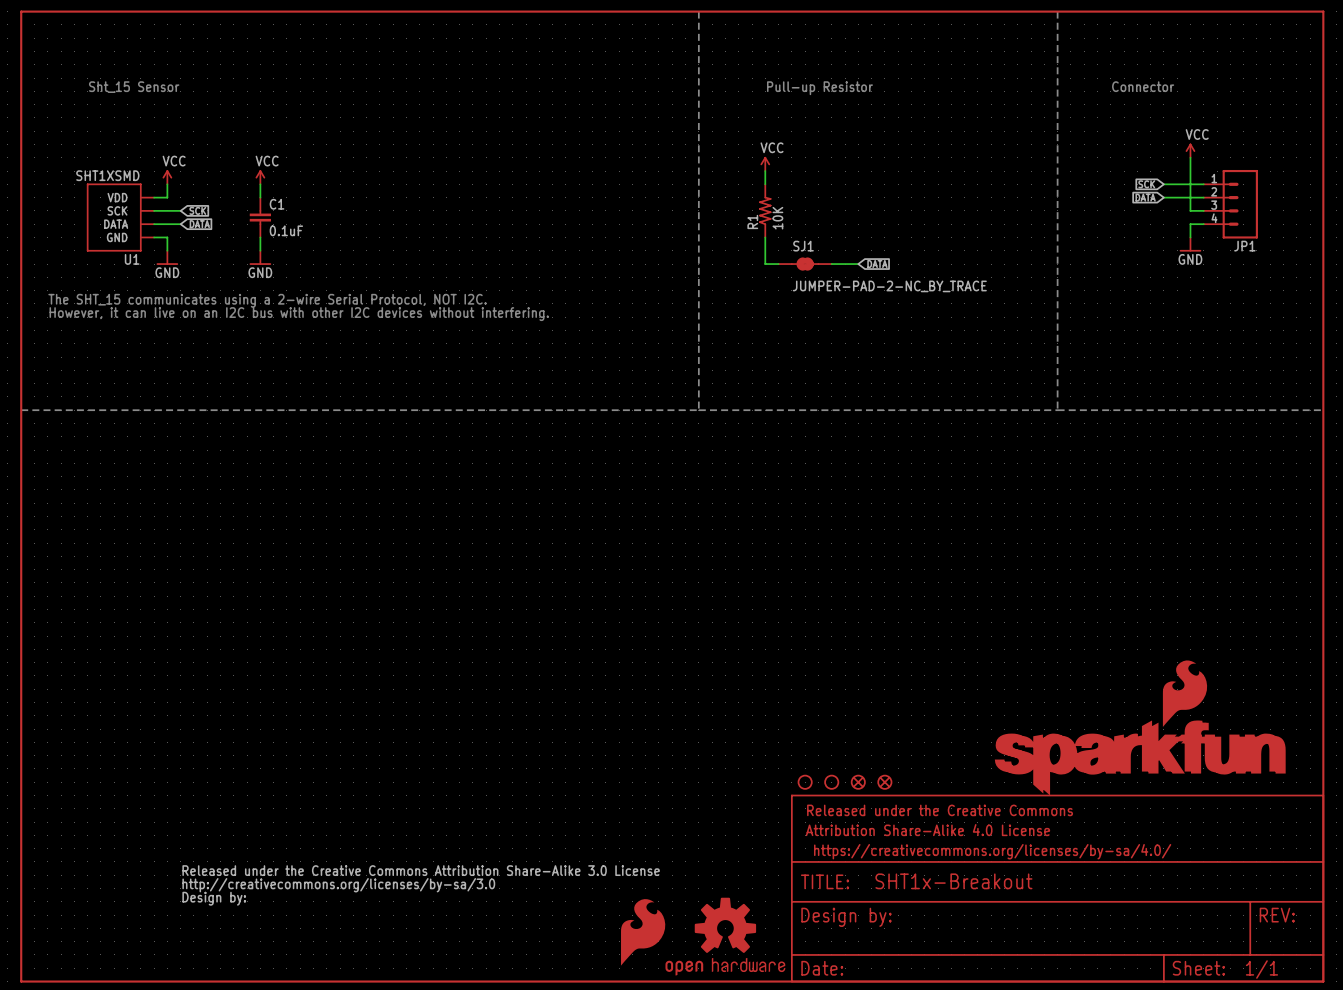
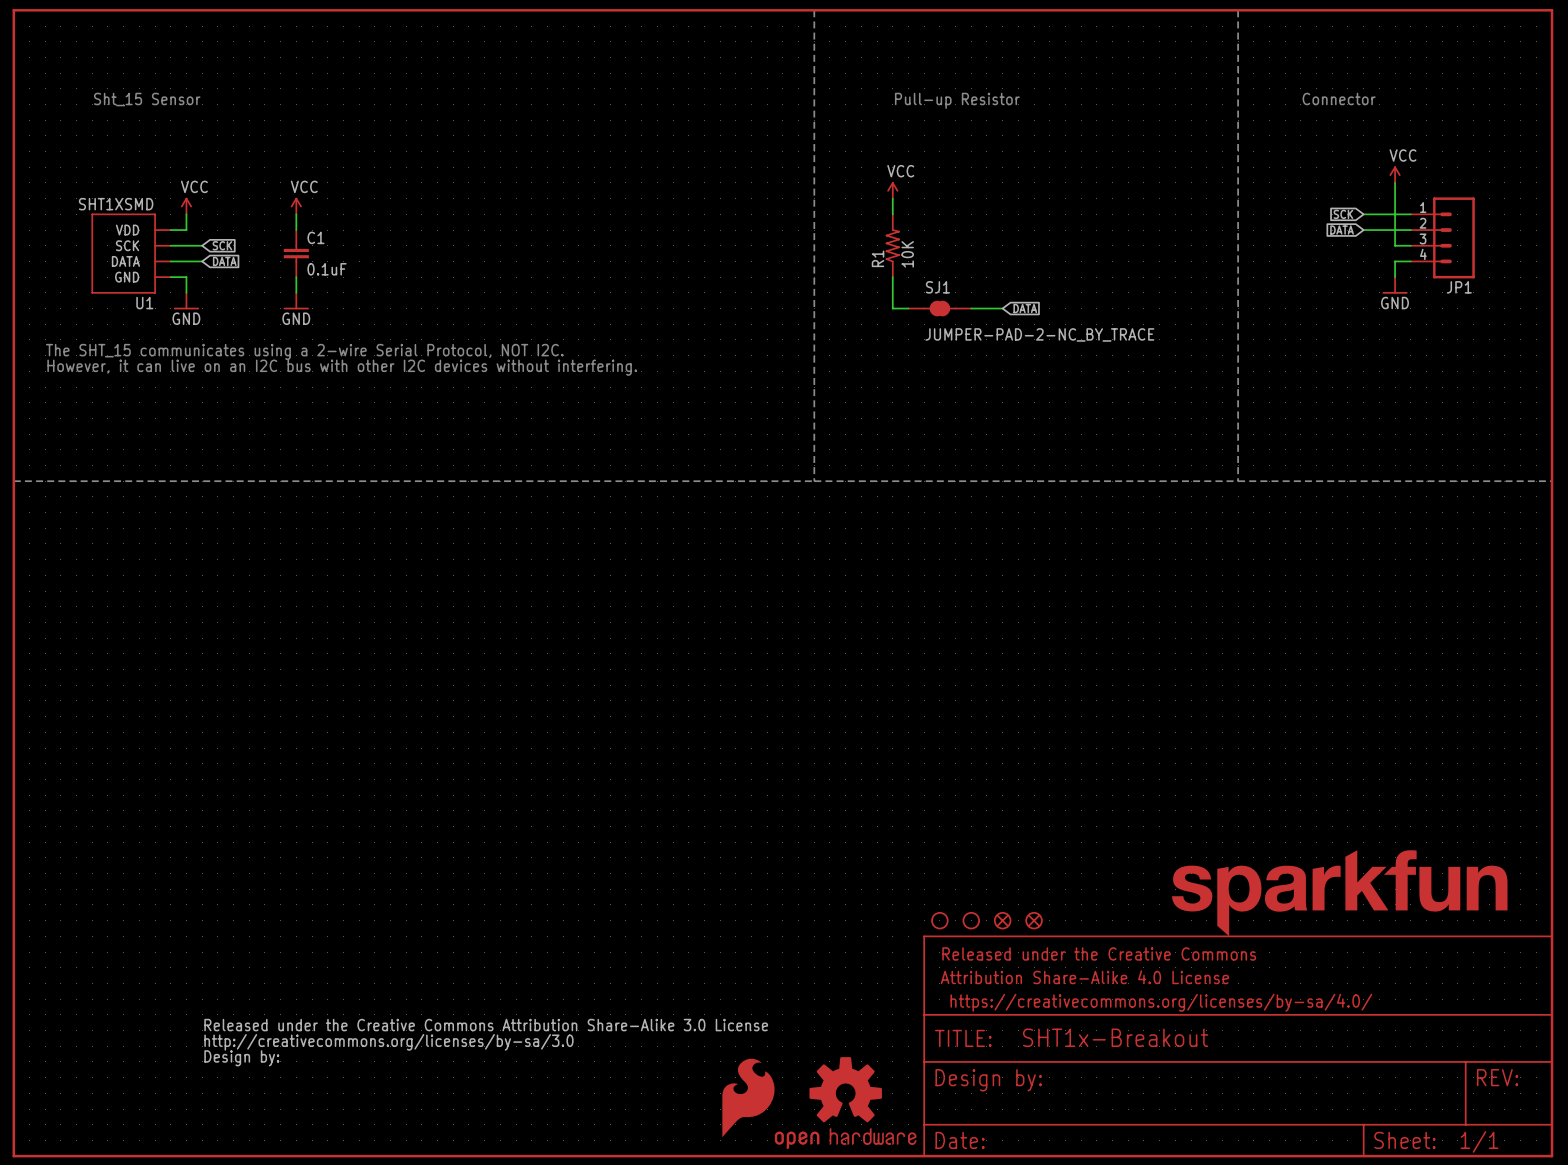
part: (1137, 727) -> none

